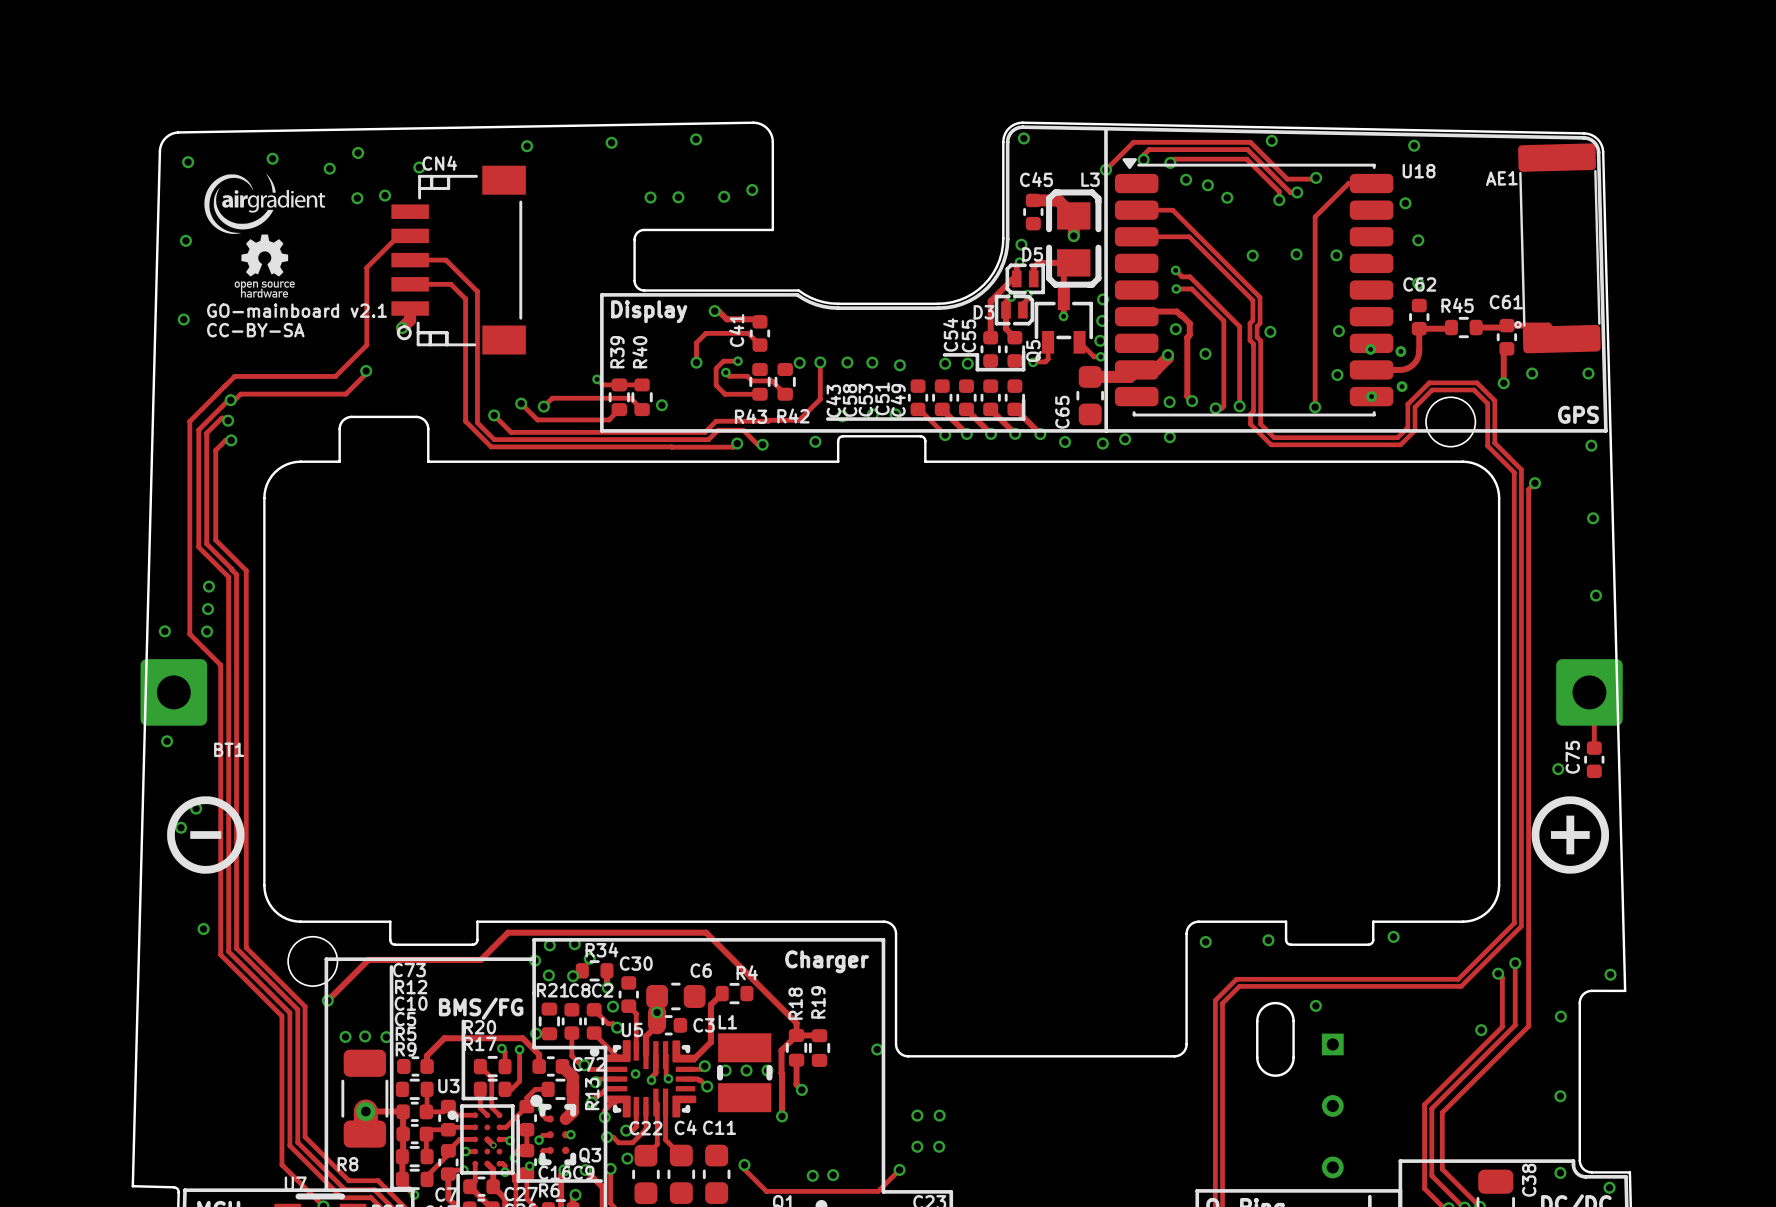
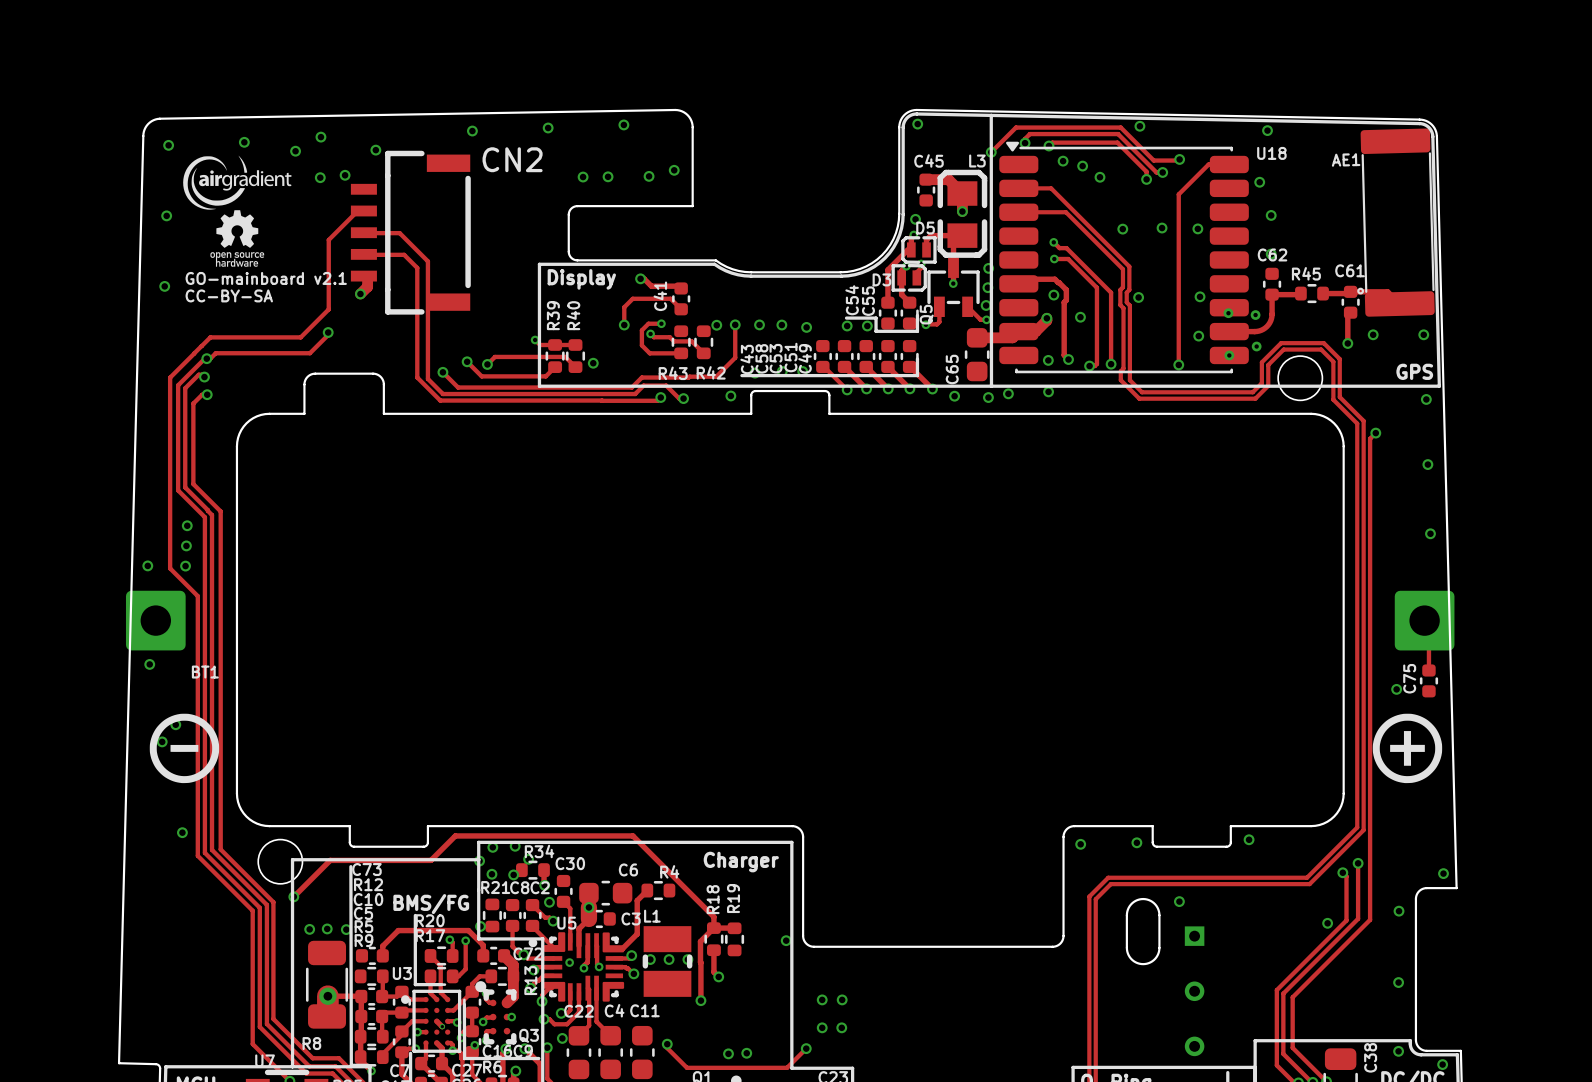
CN2: none -> (410, 232)
CN4: (458, 260) -> none

